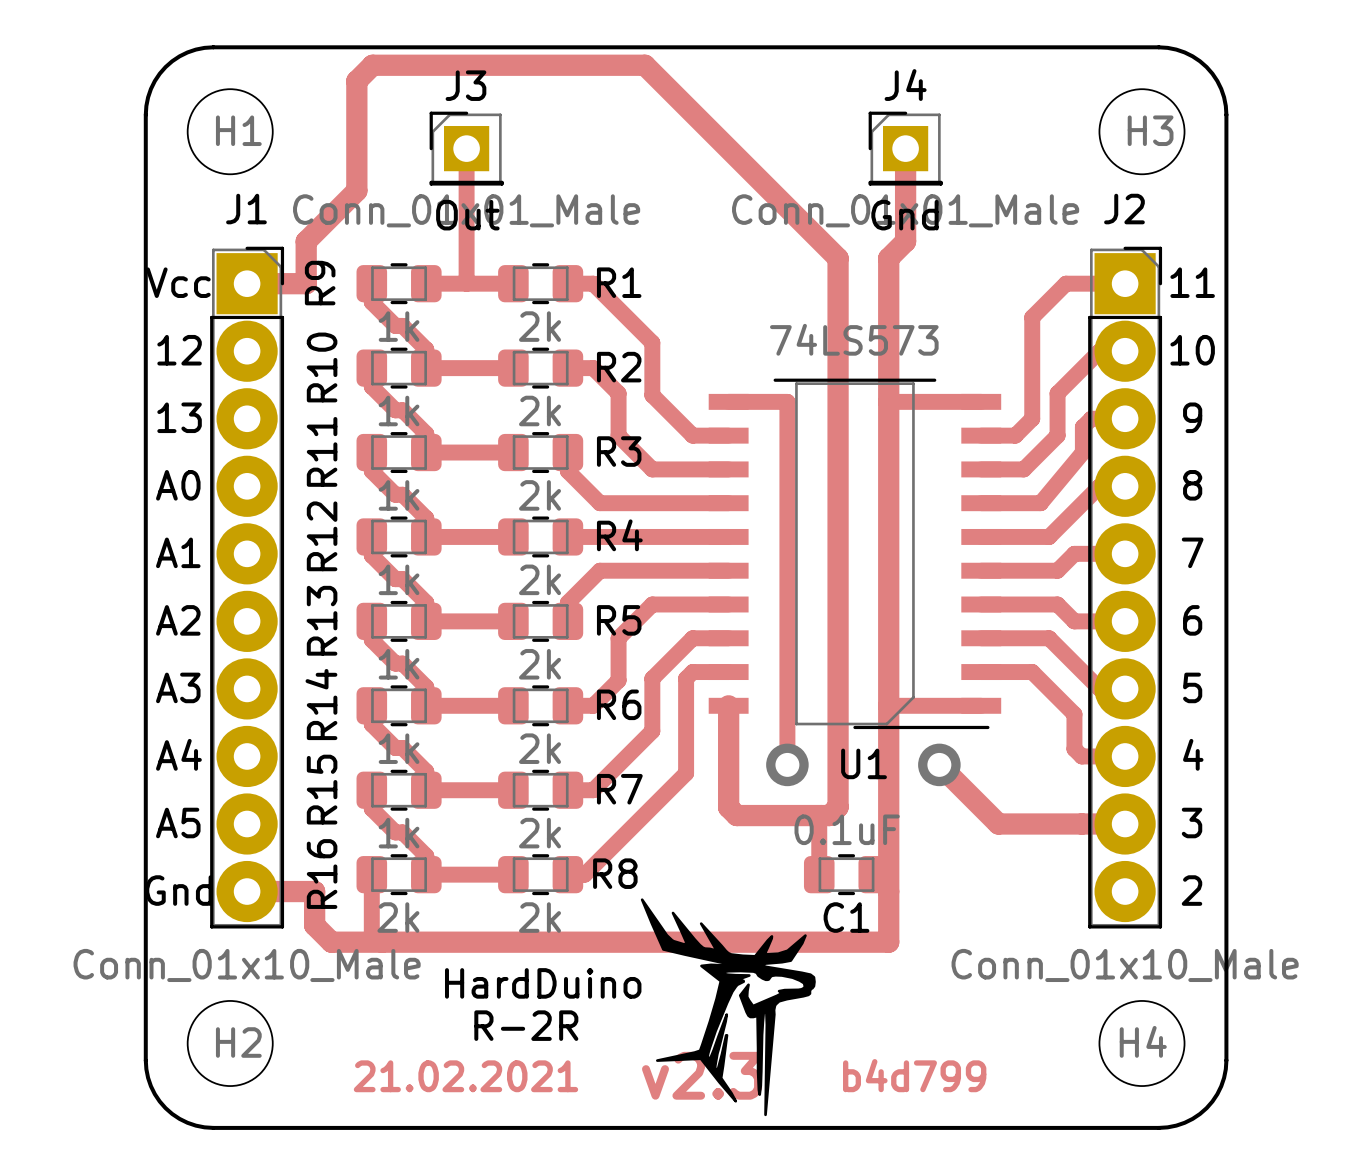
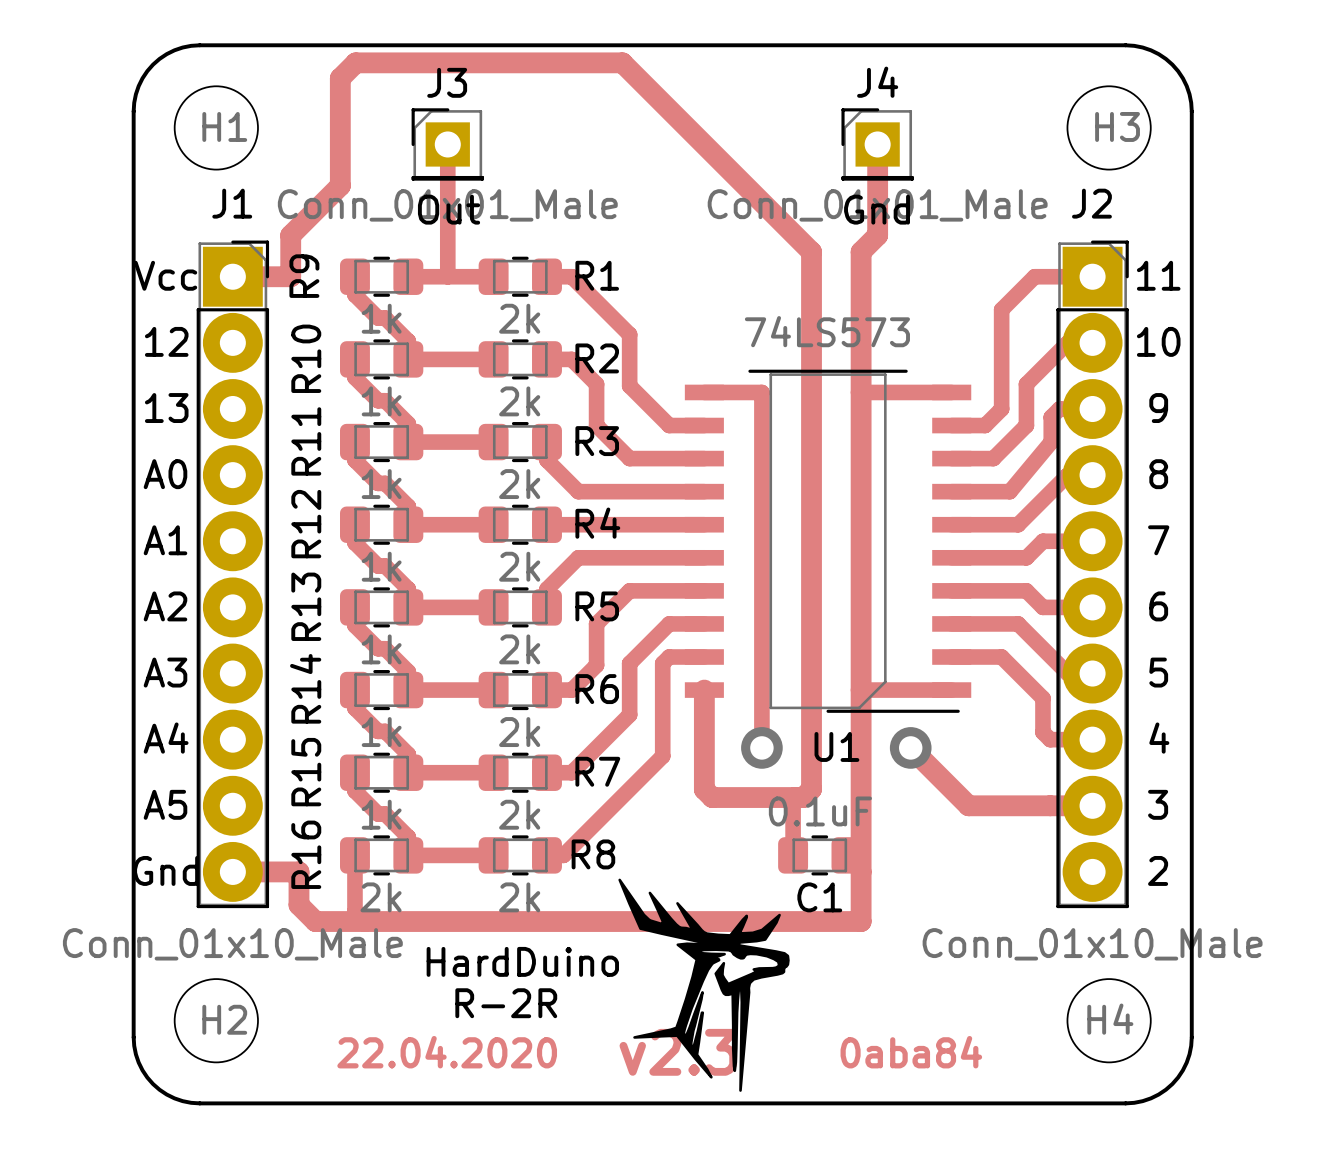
text: b4d799 (914, 1075) -> 0aba84 (911, 1052)
text: 21.02.2021 (465, 1076) -> 22.04.2020 (447, 1052)

